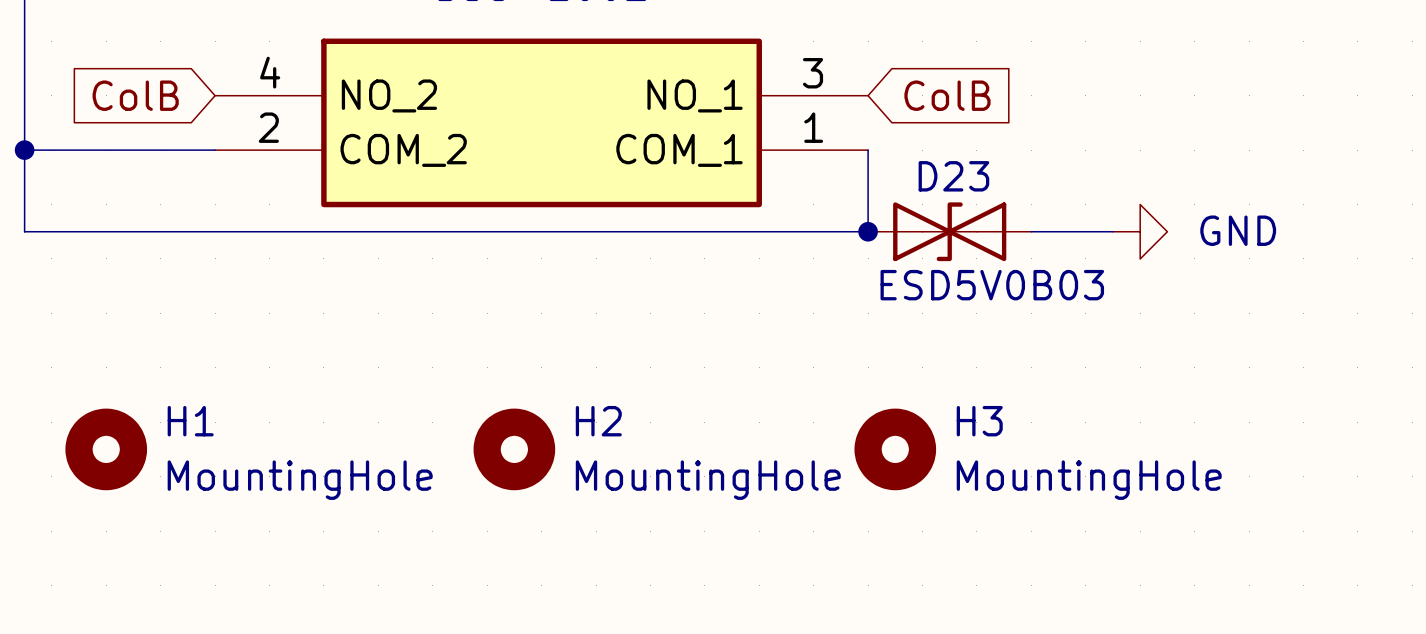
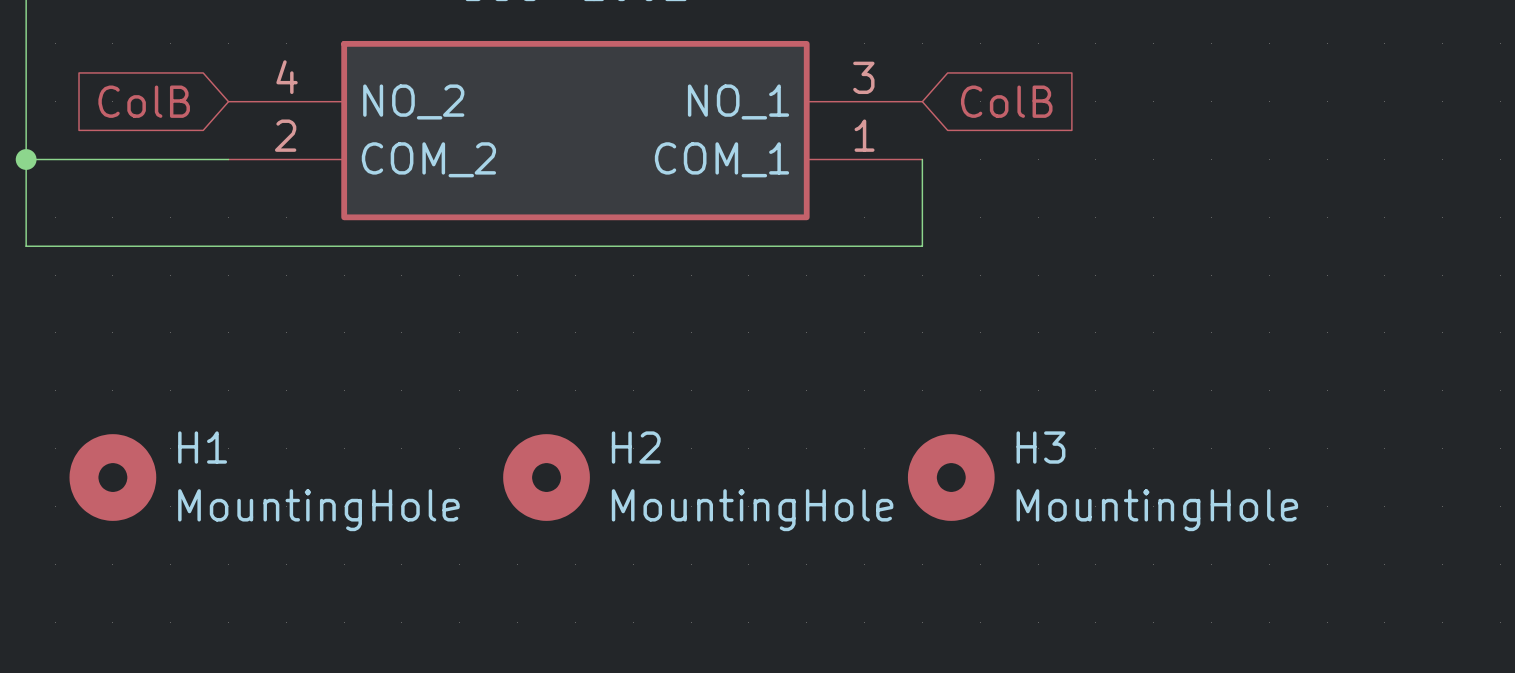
junction: (868, 231) -> none
D23: ESD5V0B03 (949, 231) -> none
wire: (1031, 231) (1112, 231) -> none
power symbol: GND (1140, 231) -> none

